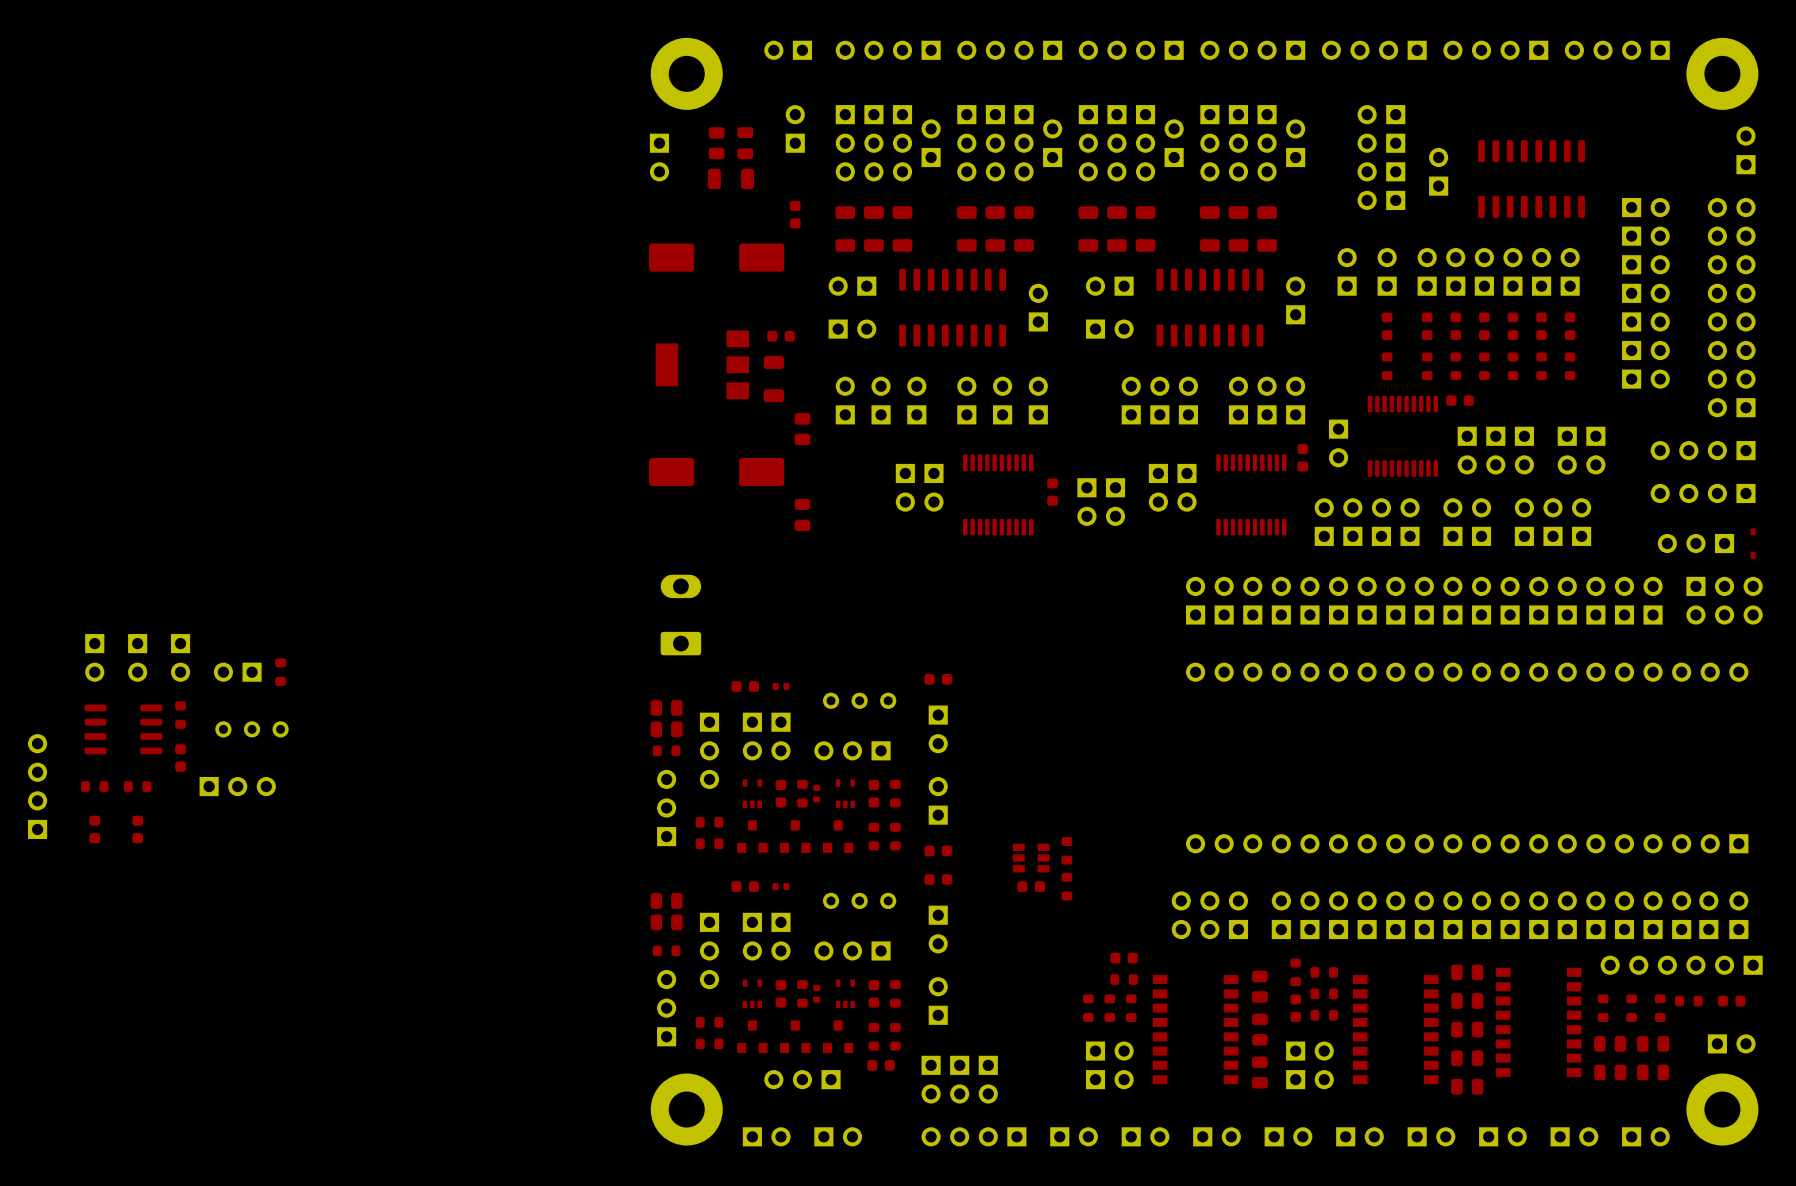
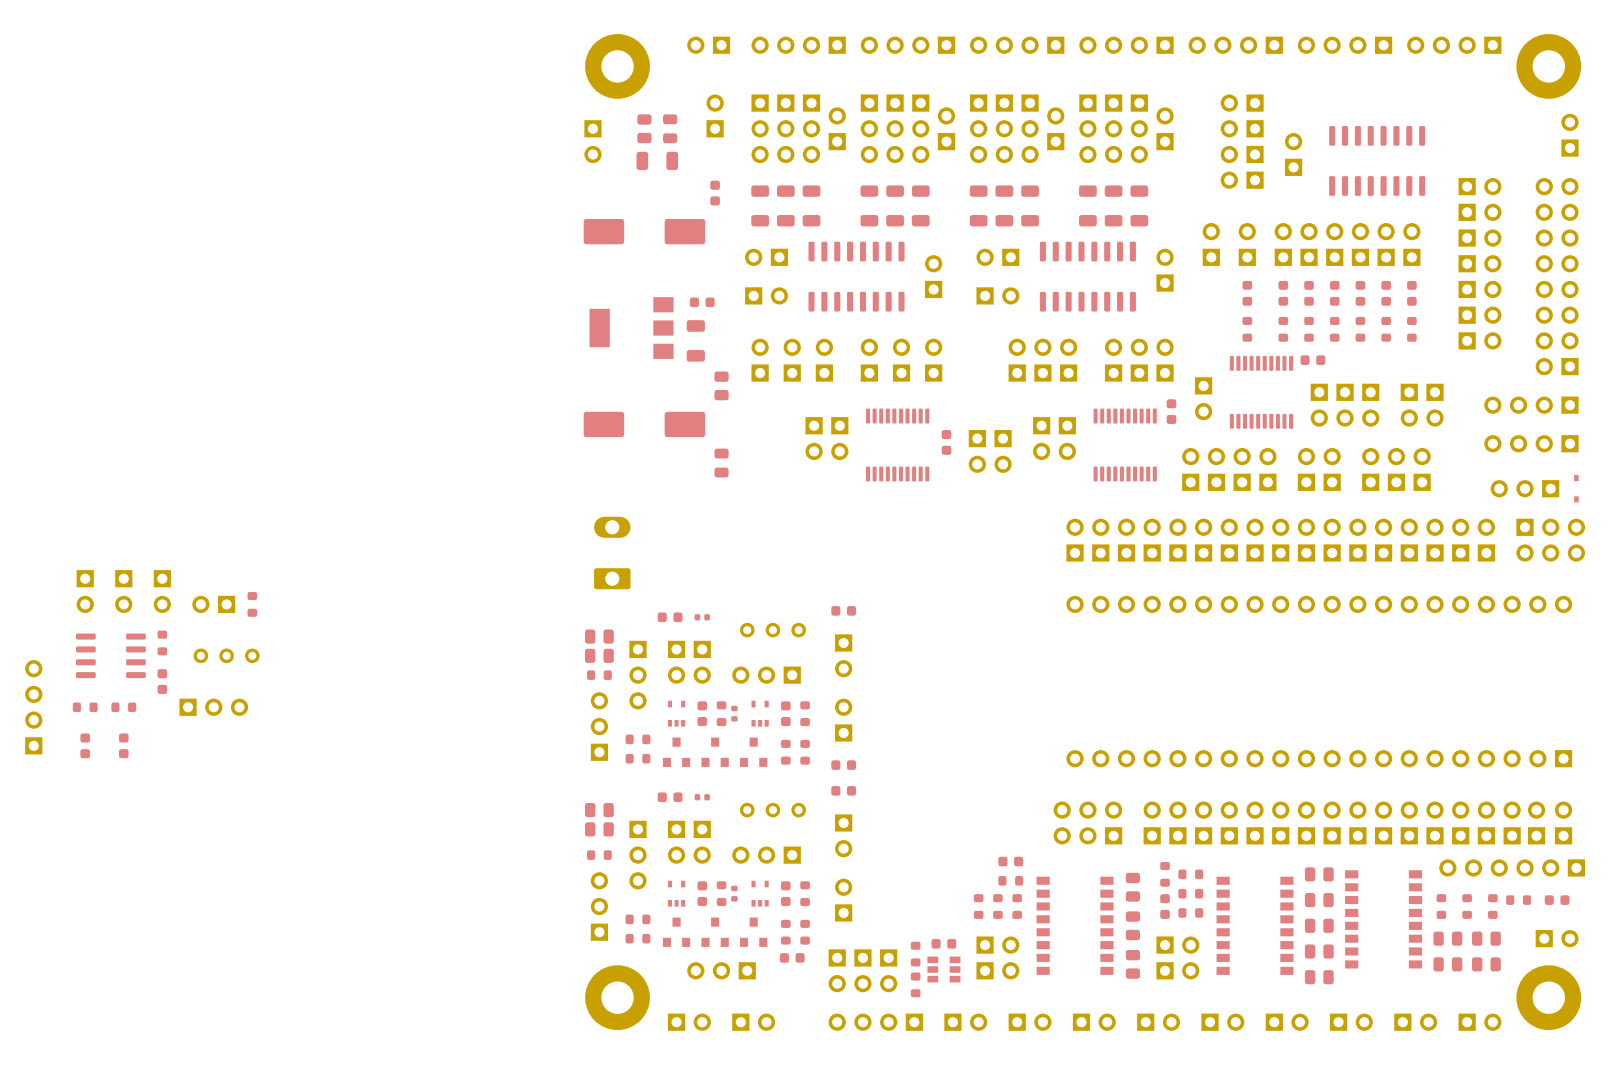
part: (1066, 850) -> none
part position: (1031, 858) -> (943, 969)
part position: (1031, 886) -> (943, 943)
part: (1066, 886) -> none
part: none -> (915, 954)
part: none -> (915, 984)

